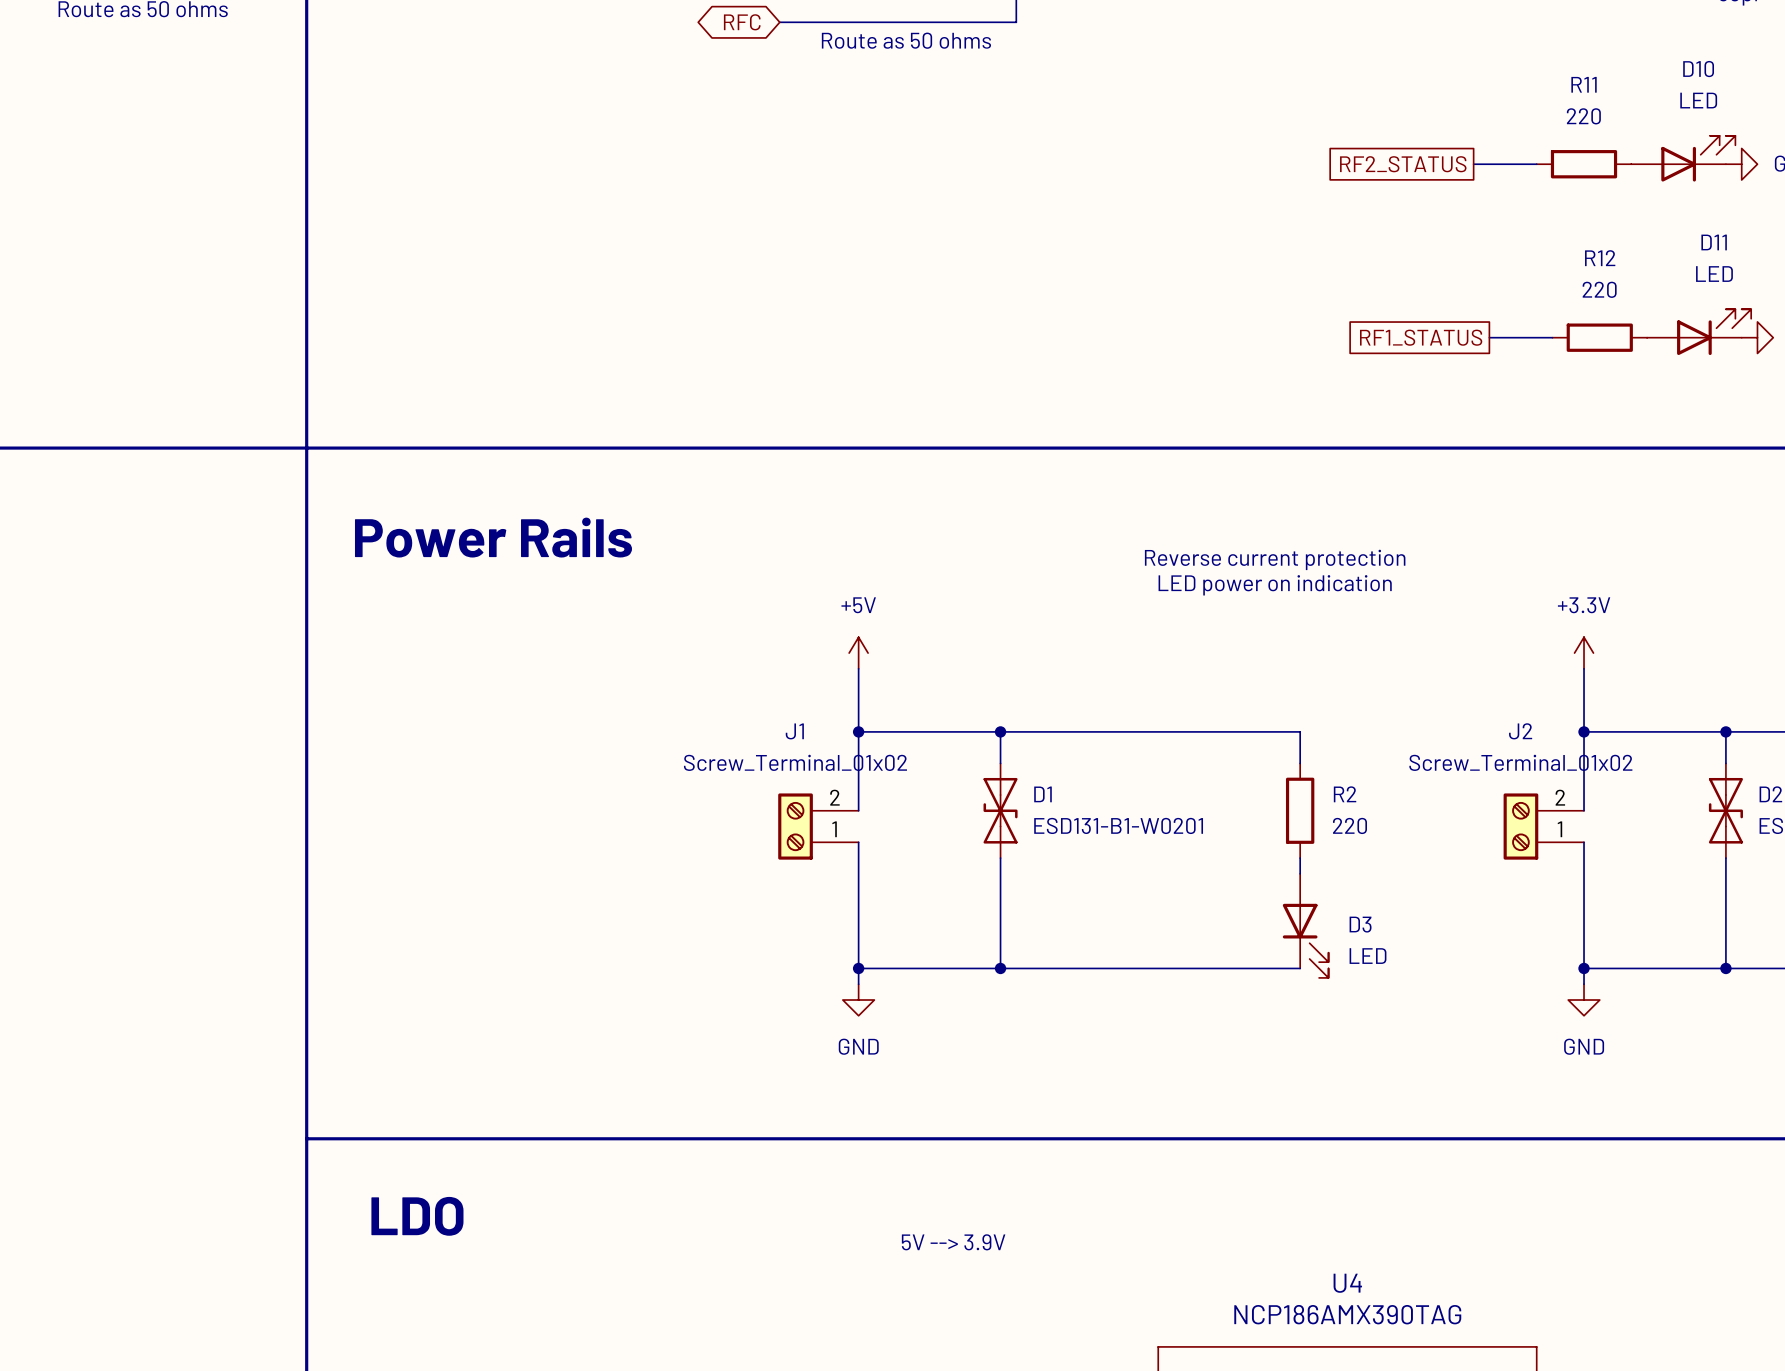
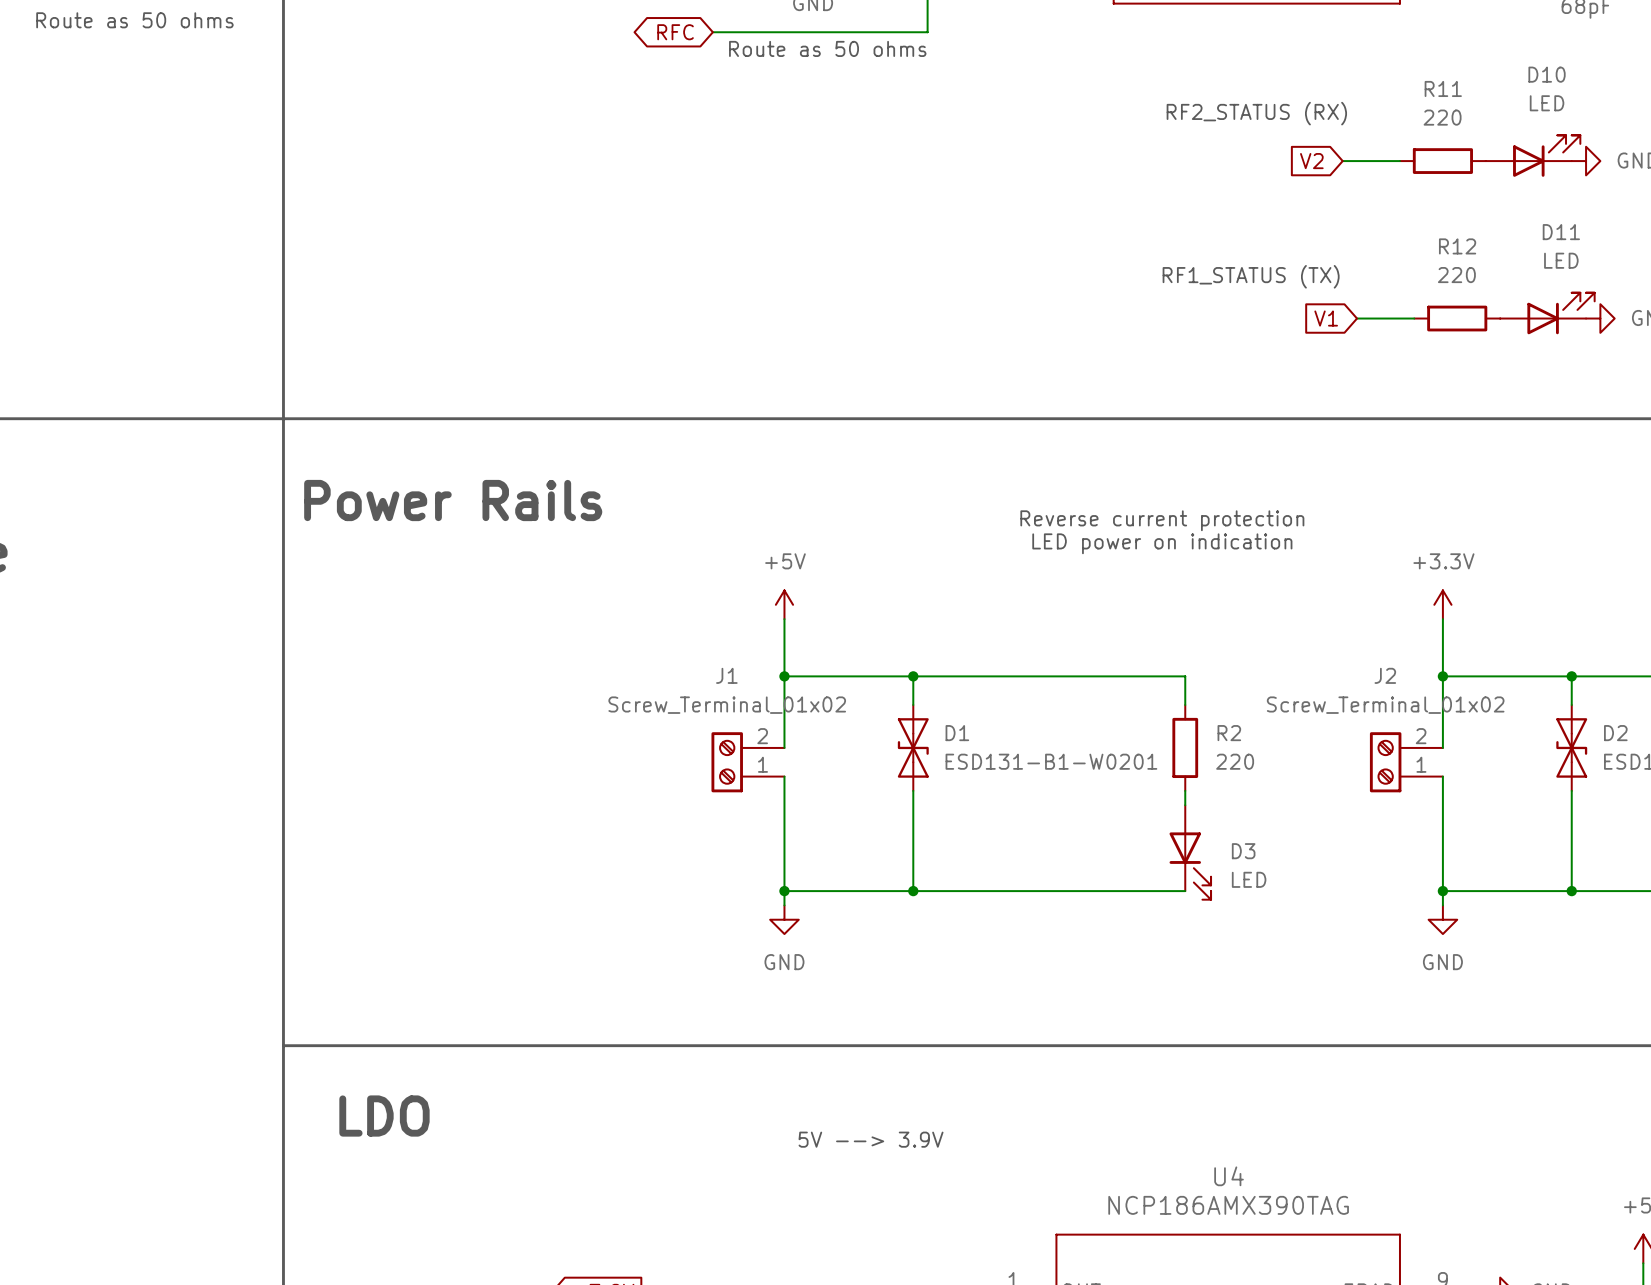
text: none -> RF2_STATUS (RX) (1256, 113)
global label shape: passive (1403, 164) -> input (1311, 161)
global label: RF2_STATUS (1403, 164) -> V2 (1311, 161)
text: none -> RF1_STATUS (TX) (1251, 276)
global label shape: passive (1421, 337) -> input (1326, 318)
global label: RF1_STATUS (1421, 337) -> V1 (1326, 318)

